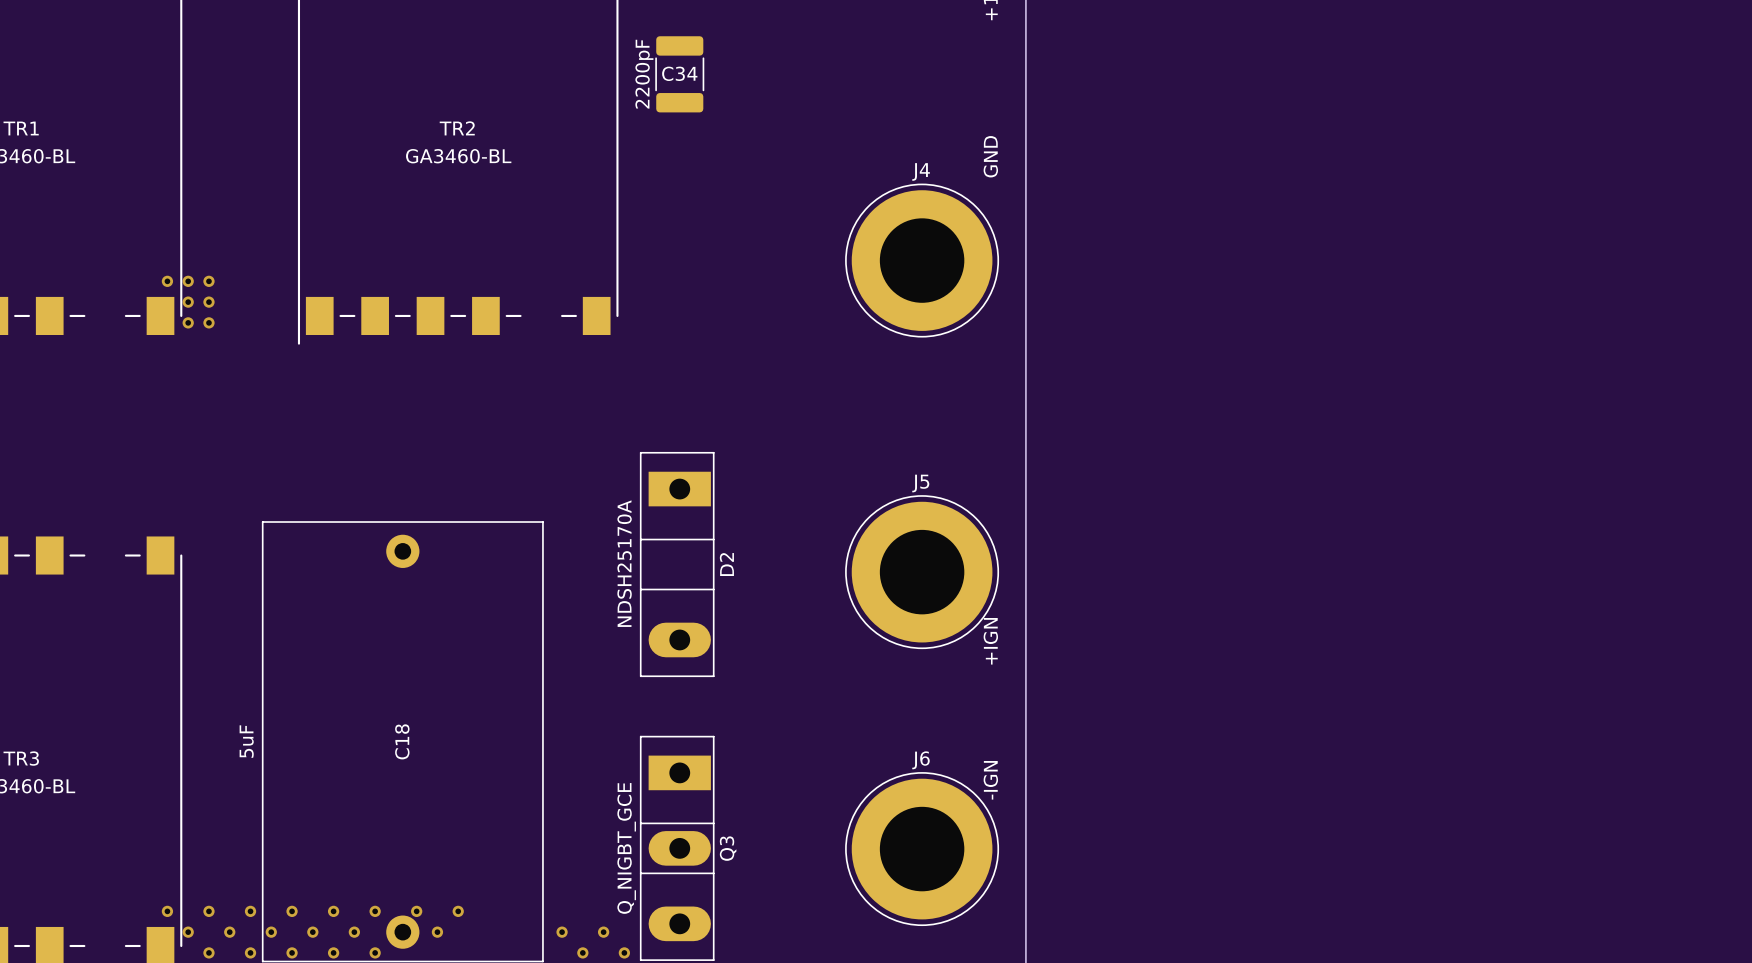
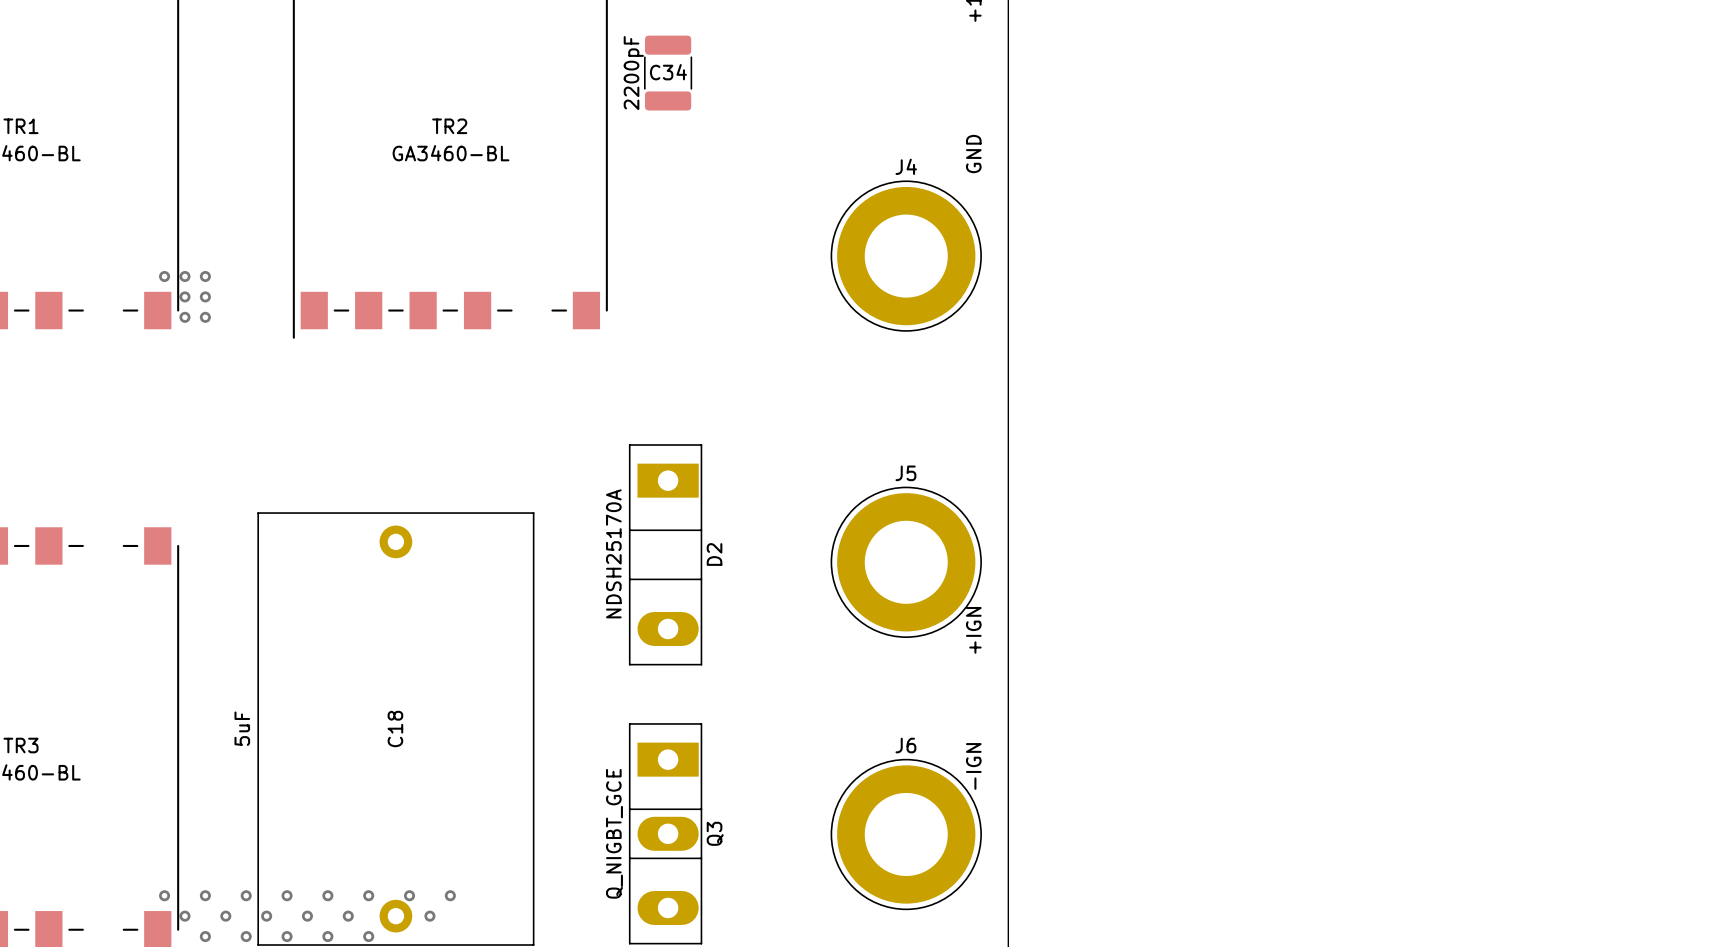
via: (562, 932) -> none
via: (603, 932) -> none
via: (582, 952) -> none
via: (624, 952) -> none

